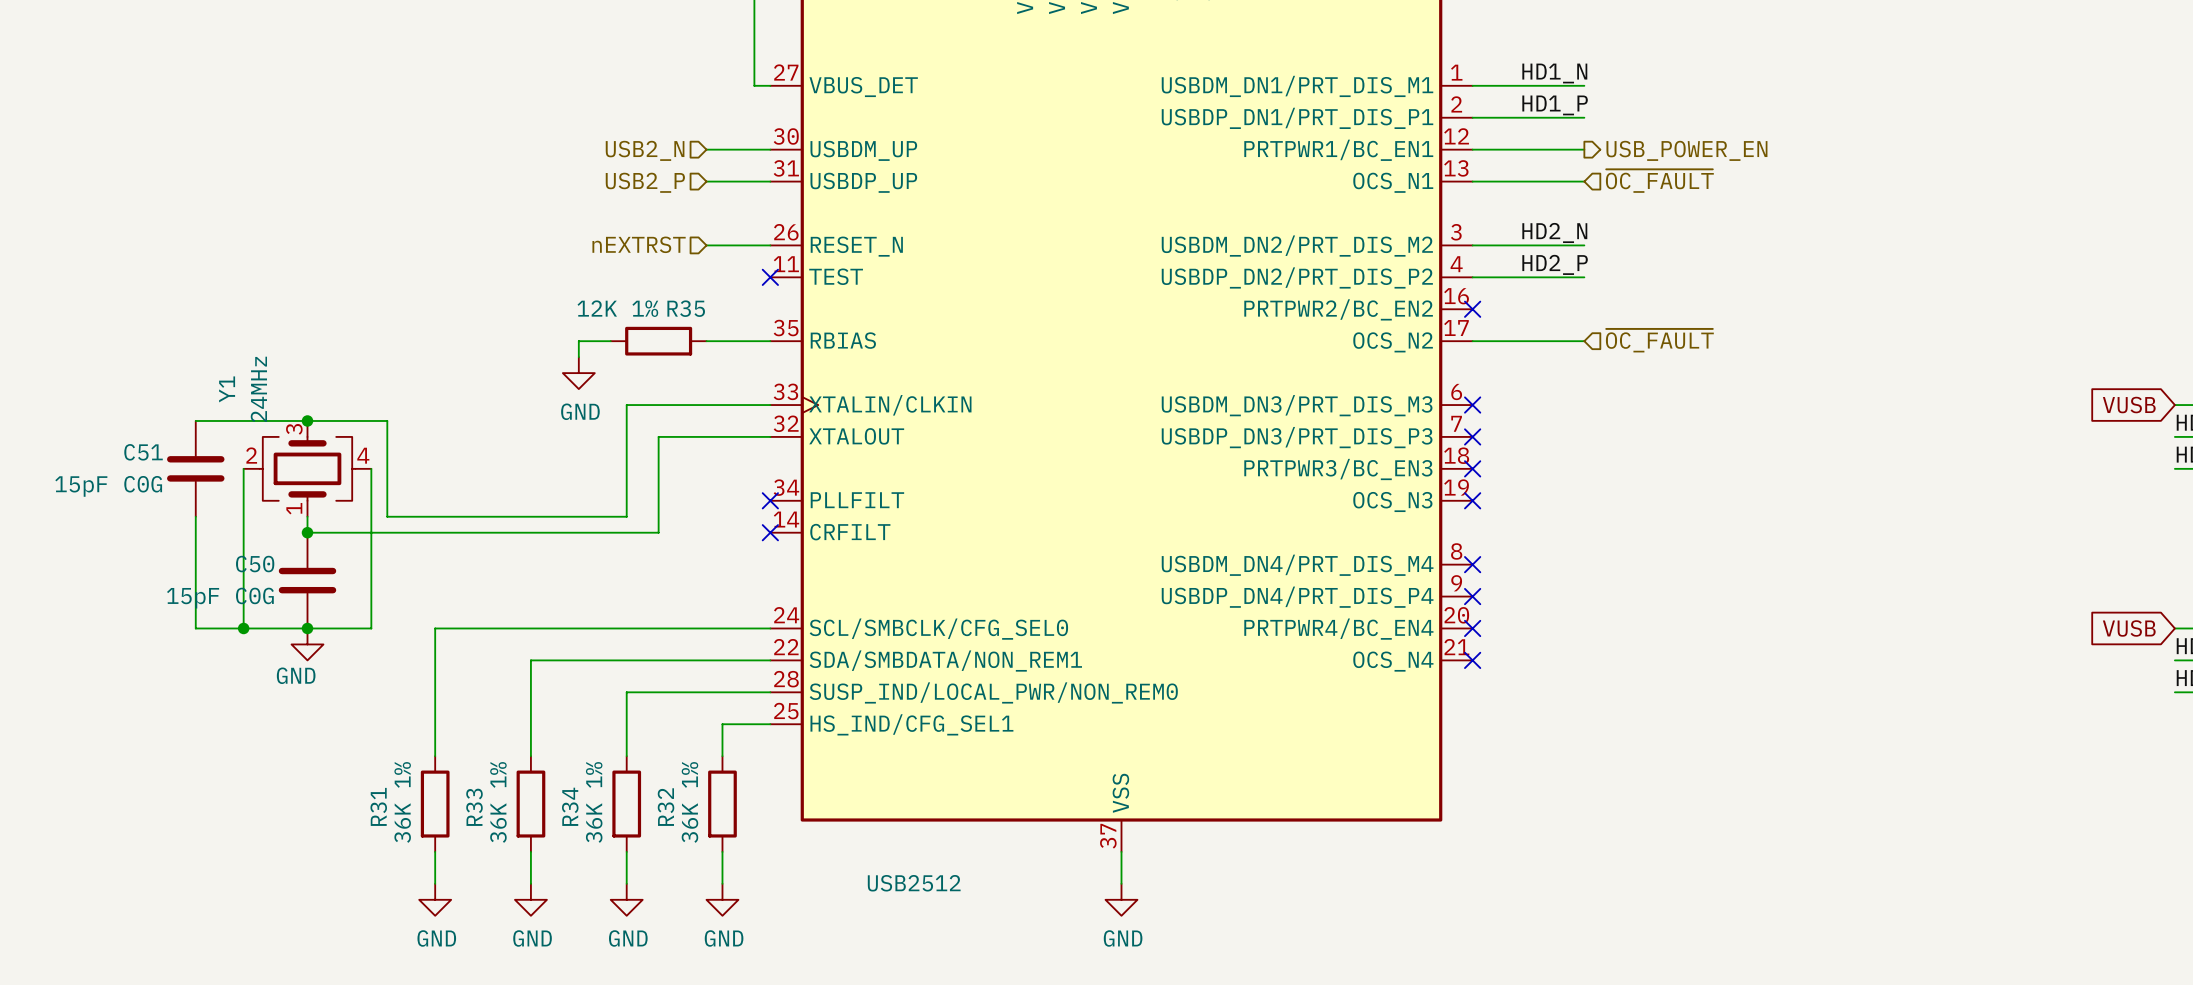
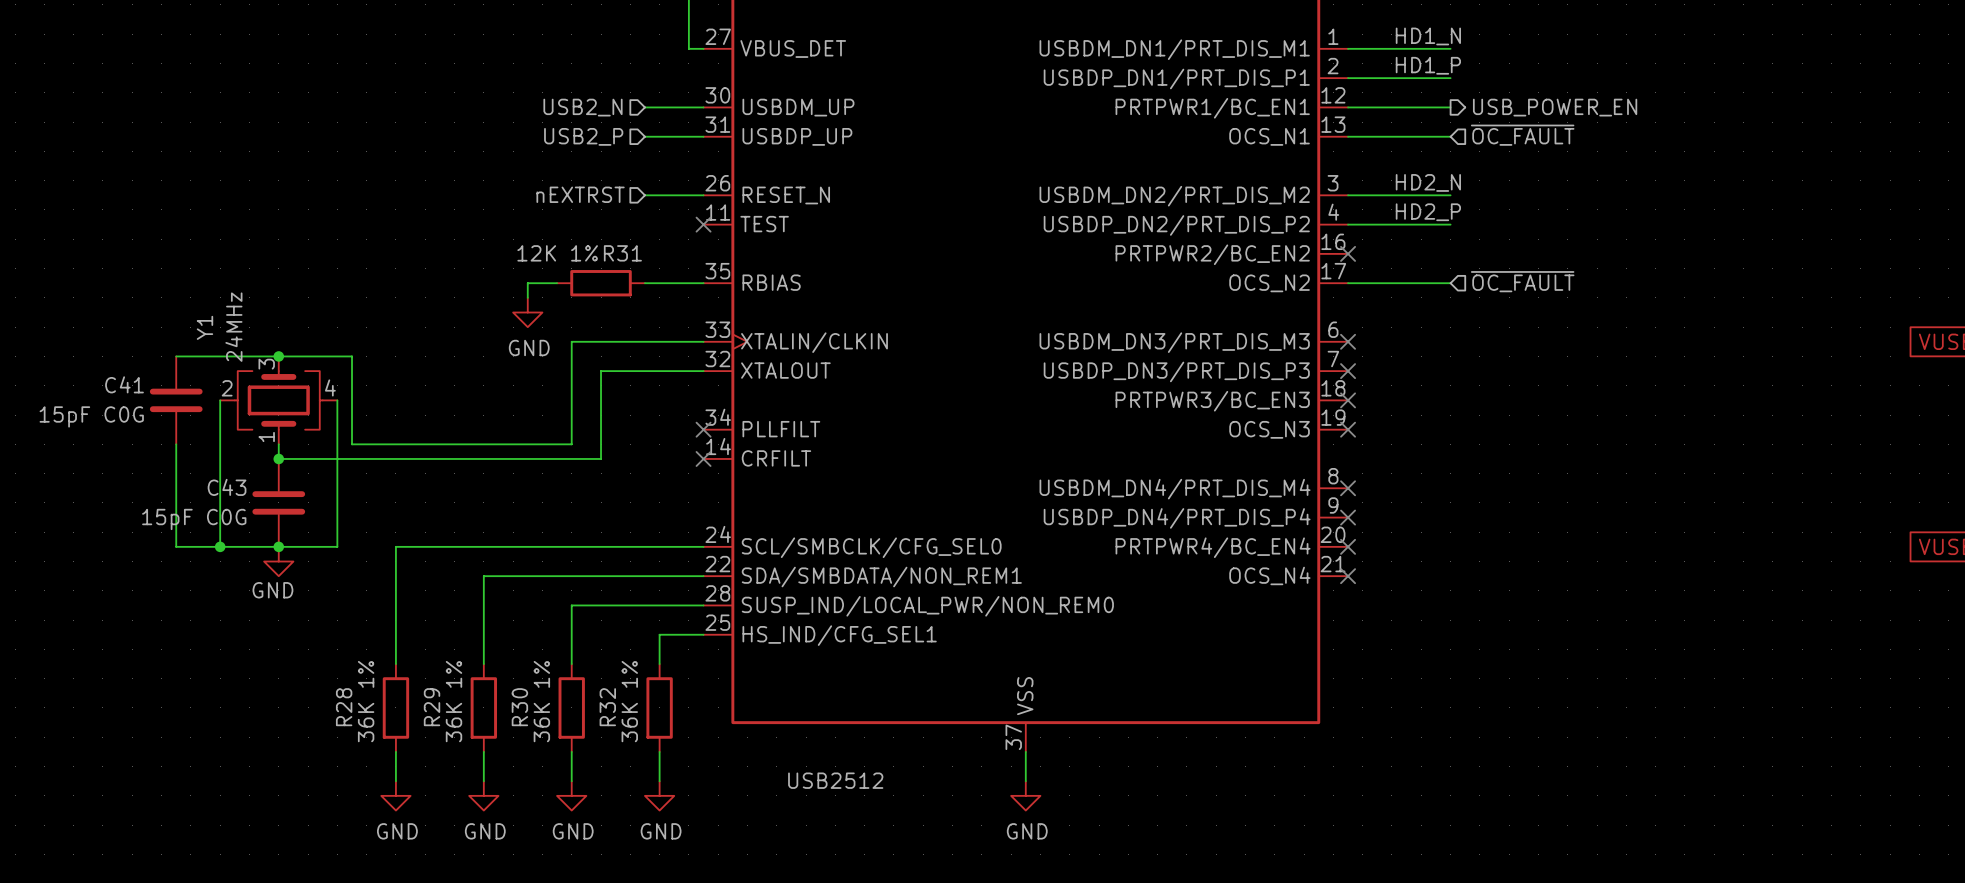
R35 name: R35 (686, 308) -> R31 (622, 253)
C51 name: C51 (143, 452) -> C41 (124, 384)
C50 name: C50 (255, 564) -> C43 (227, 487)
R31 name: R31 (378, 806) -> R28 (344, 707)
R34 name: R34 (570, 806) -> R30 (519, 707)
R33 name: R33 (474, 807) -> R29 (432, 707)

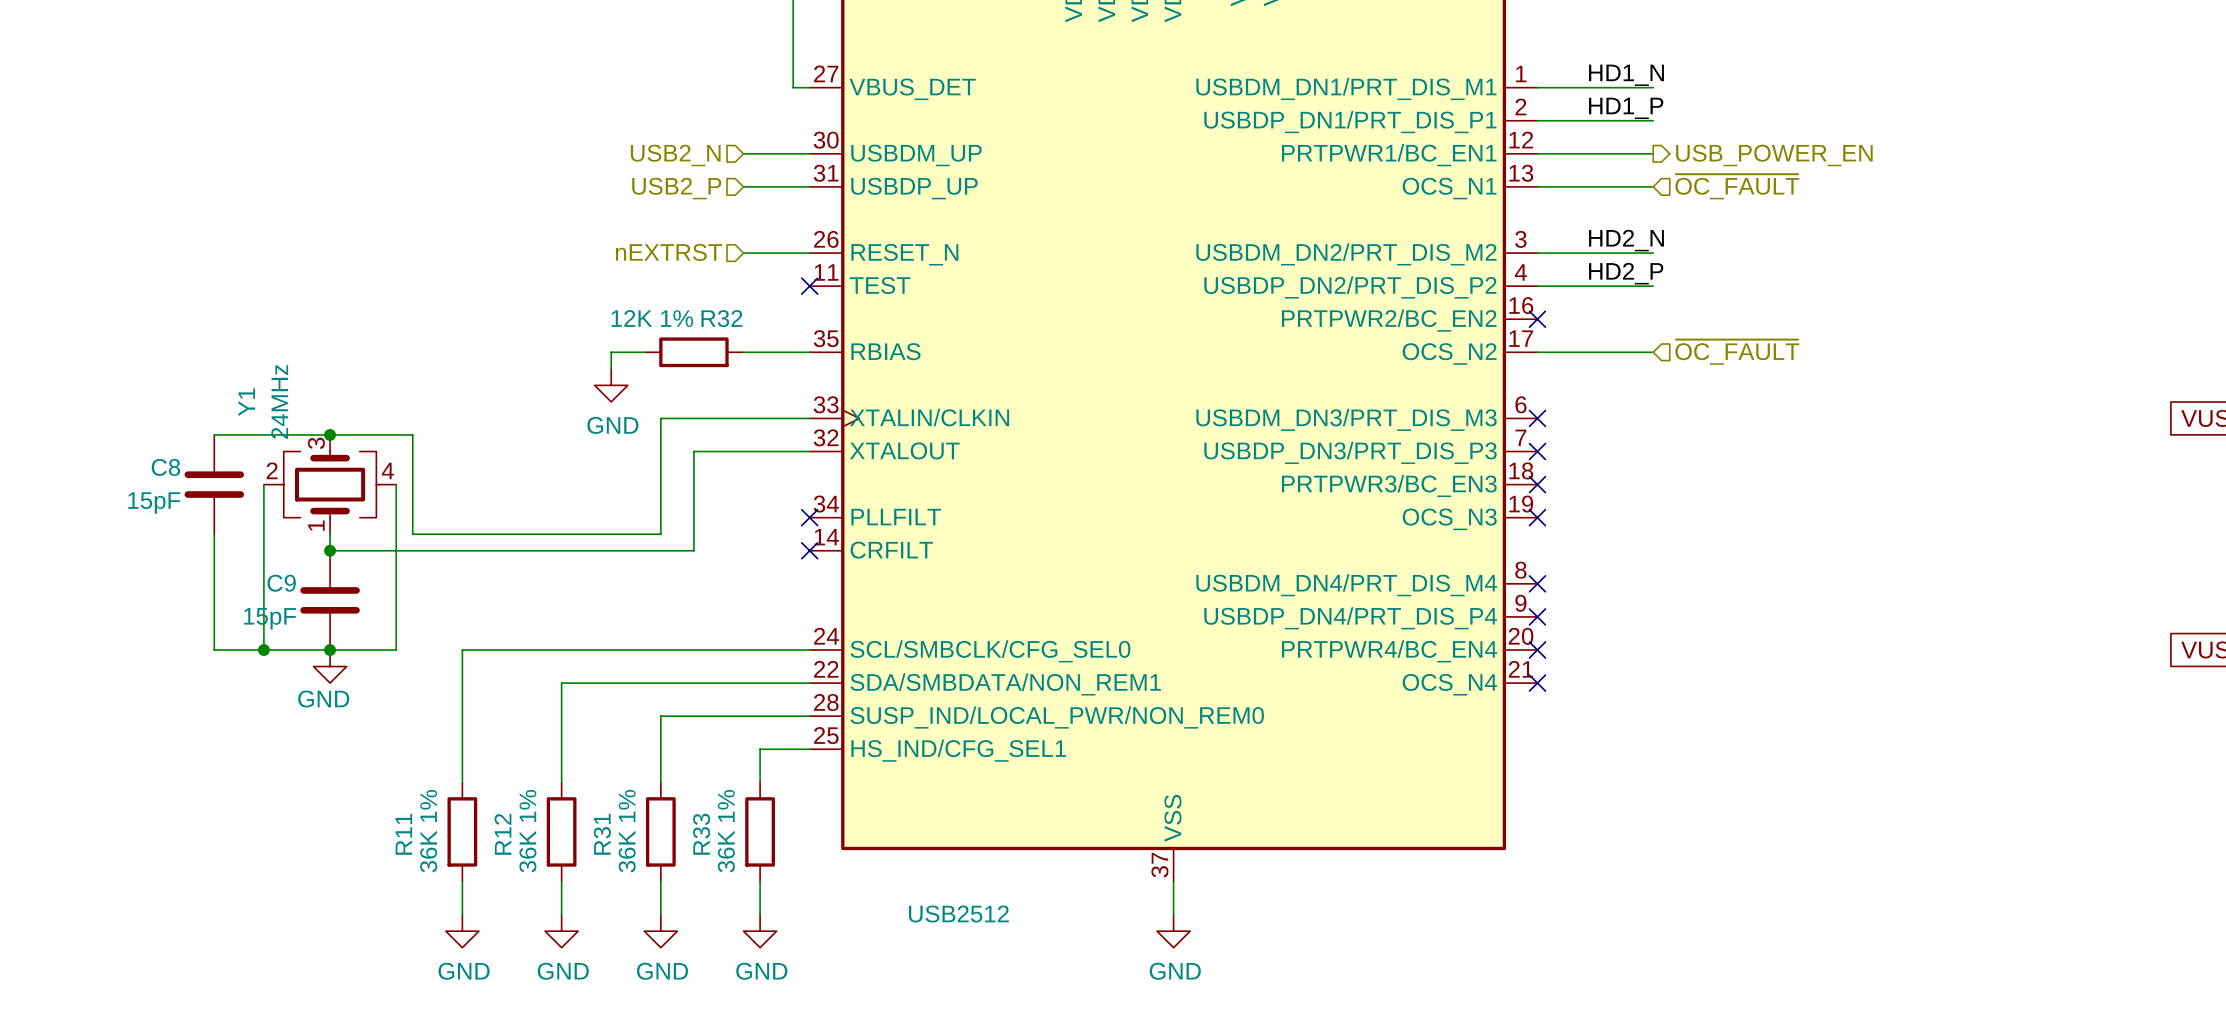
R31 name: R31 (622, 253) -> R32 (721, 318)
C41 name: C41 (124, 384) -> C8 (165, 467)
C41 value: 15pF C0G (91, 416) -> 15pF (154, 503)
C43 name: C43 (227, 487) -> C9 (281, 583)
C43 value: 15pF C0G (194, 519) -> 15pF (270, 618)
R28 name: R28 (344, 707) -> R11 (403, 834)
R29 name: R29 (432, 707) -> R12 (502, 834)
R30 name: R30 (519, 707) -> R31 (602, 834)
R32 name: R32 (607, 707) -> R33 (701, 834)

